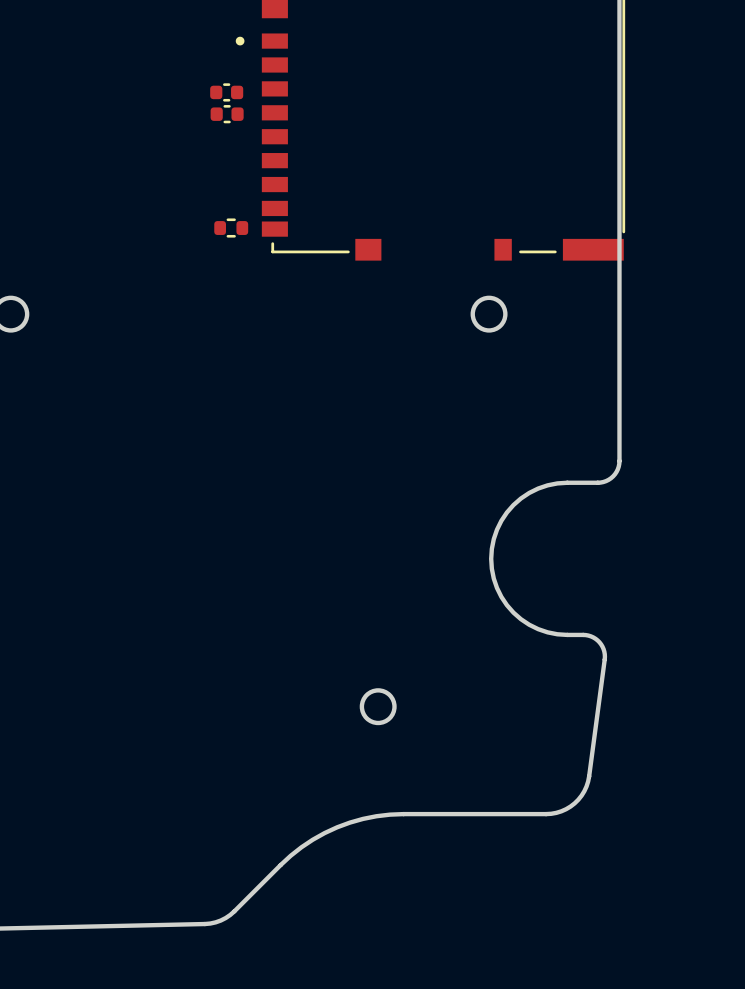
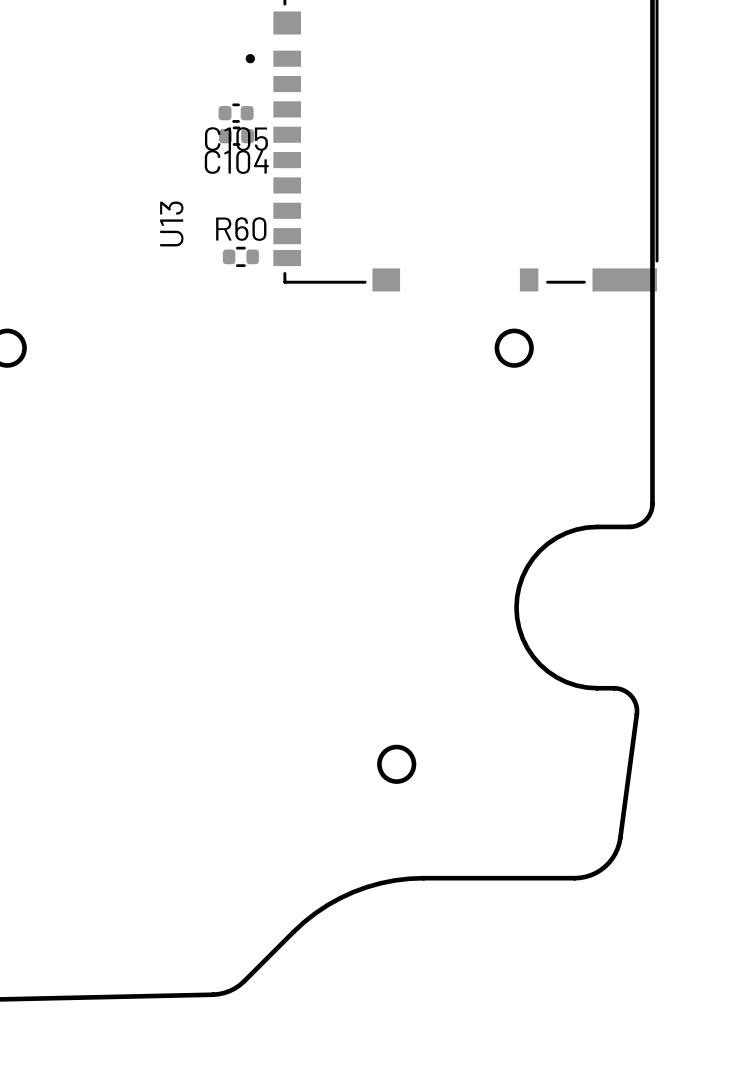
C105 name: none -> C105 (236, 139)
C104 name: none -> C104 (236, 162)
U13 name: none -> U13 (171, 223)
R60 name: none -> R60 (241, 229)

